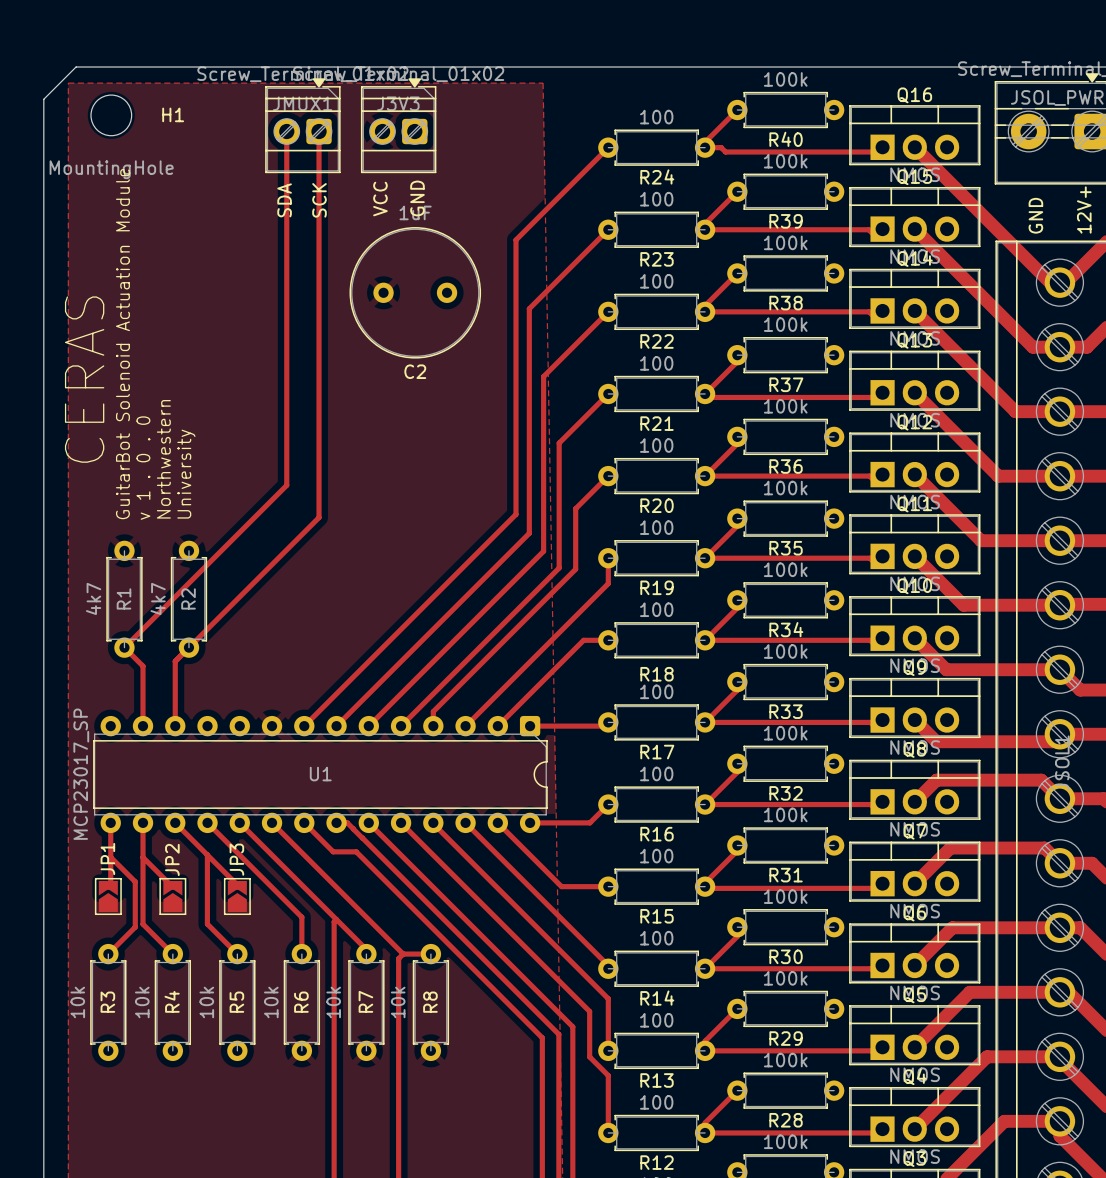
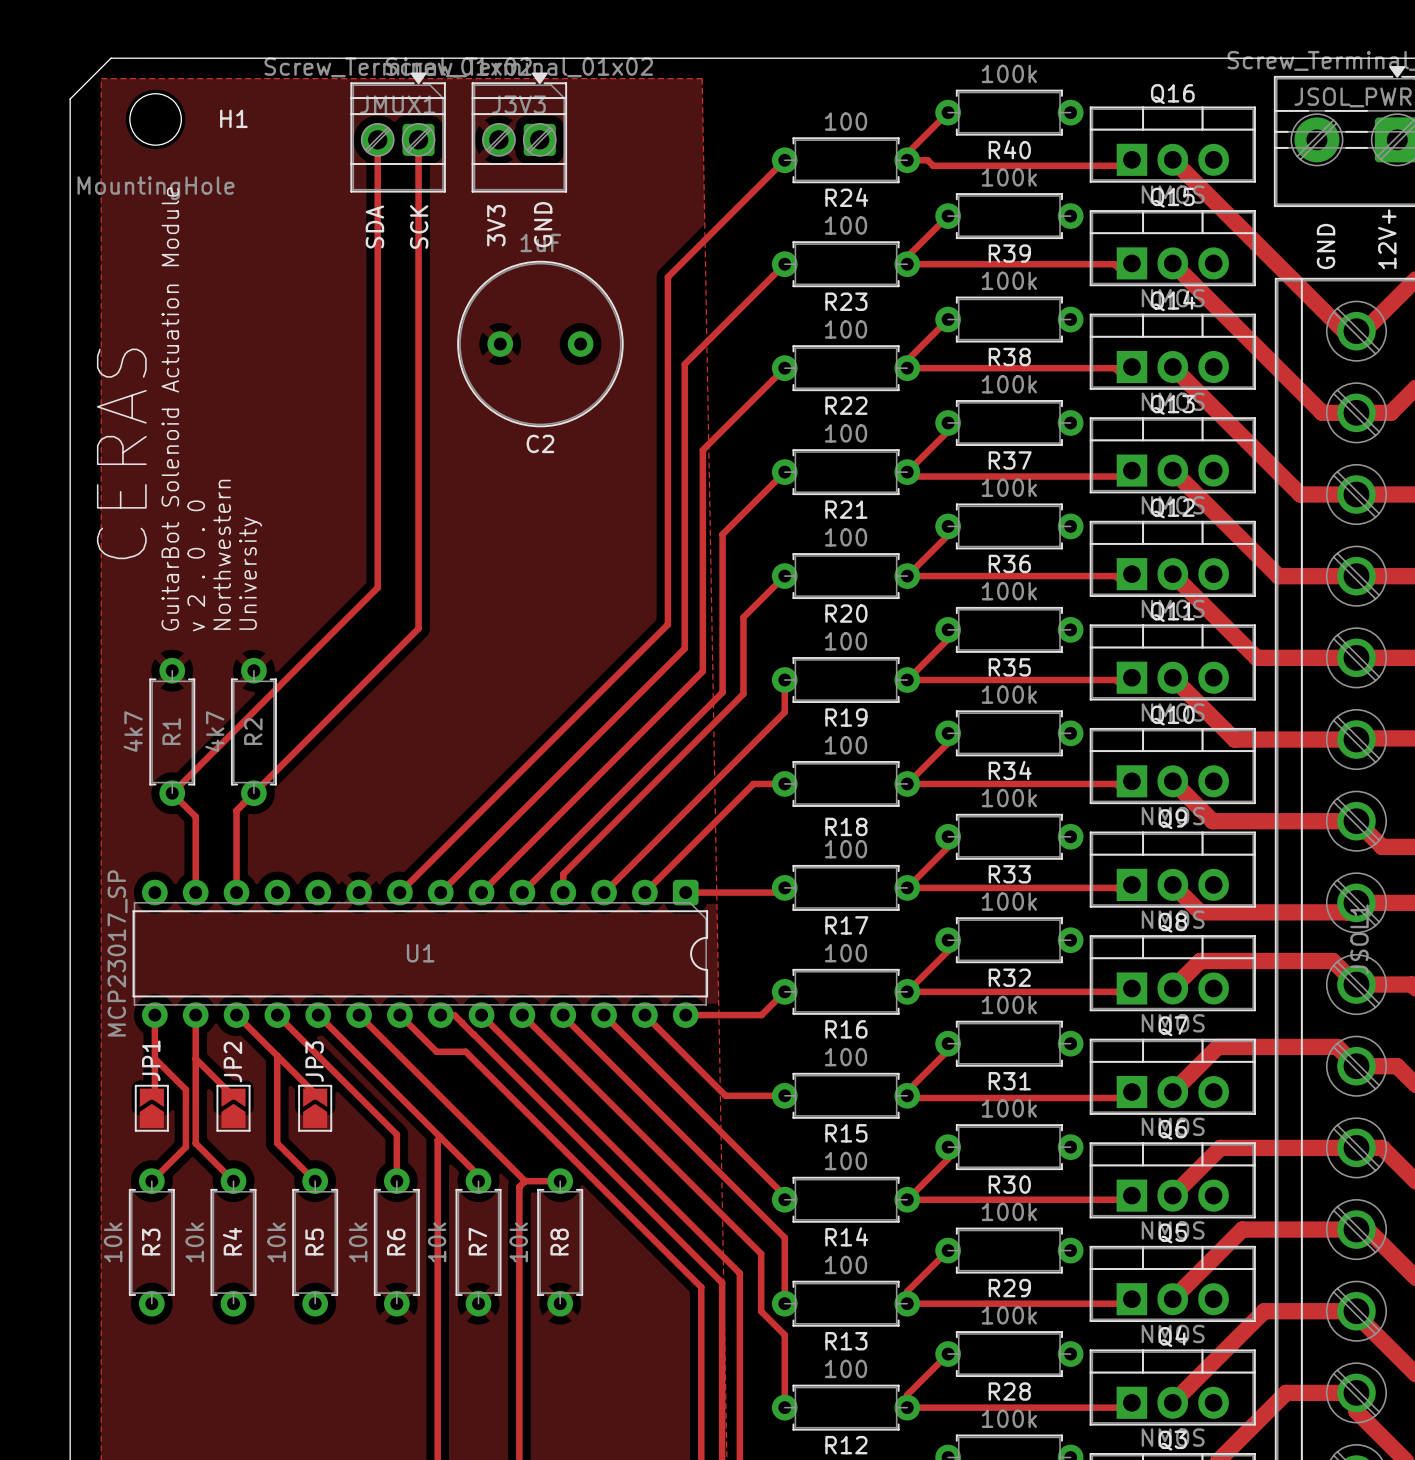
text: VCC (380, 199) -> 3V3 (496, 225)
text: v 1 . 0 . 0 (143, 468) -> v 2 . 0 . 0 (196, 565)

